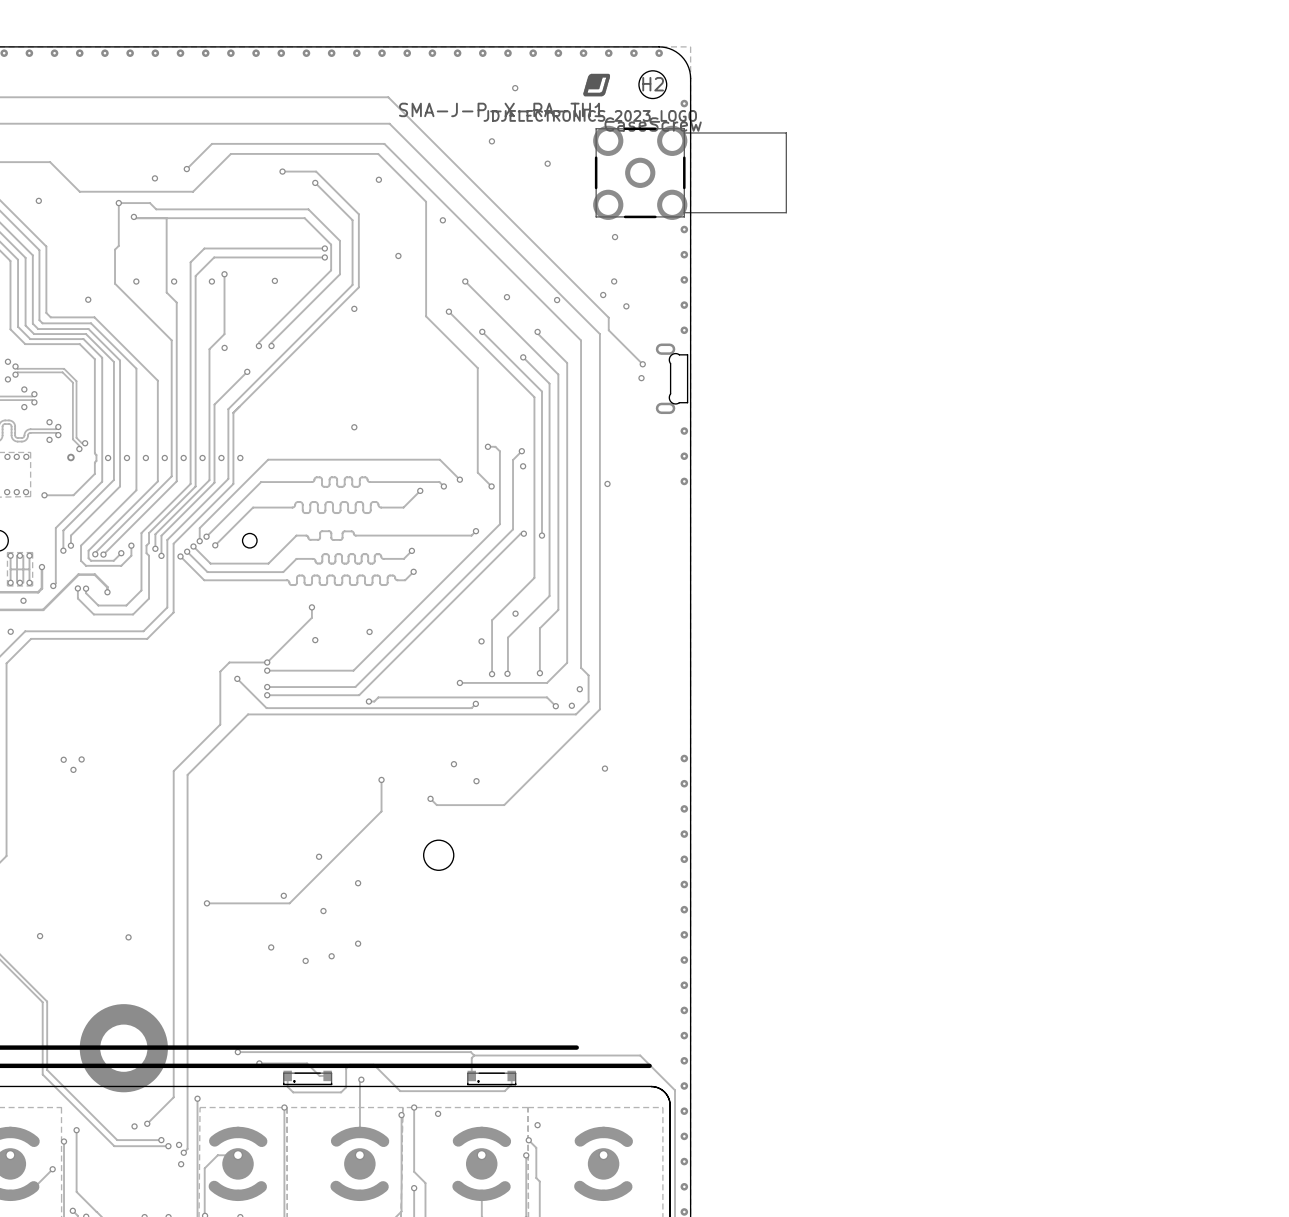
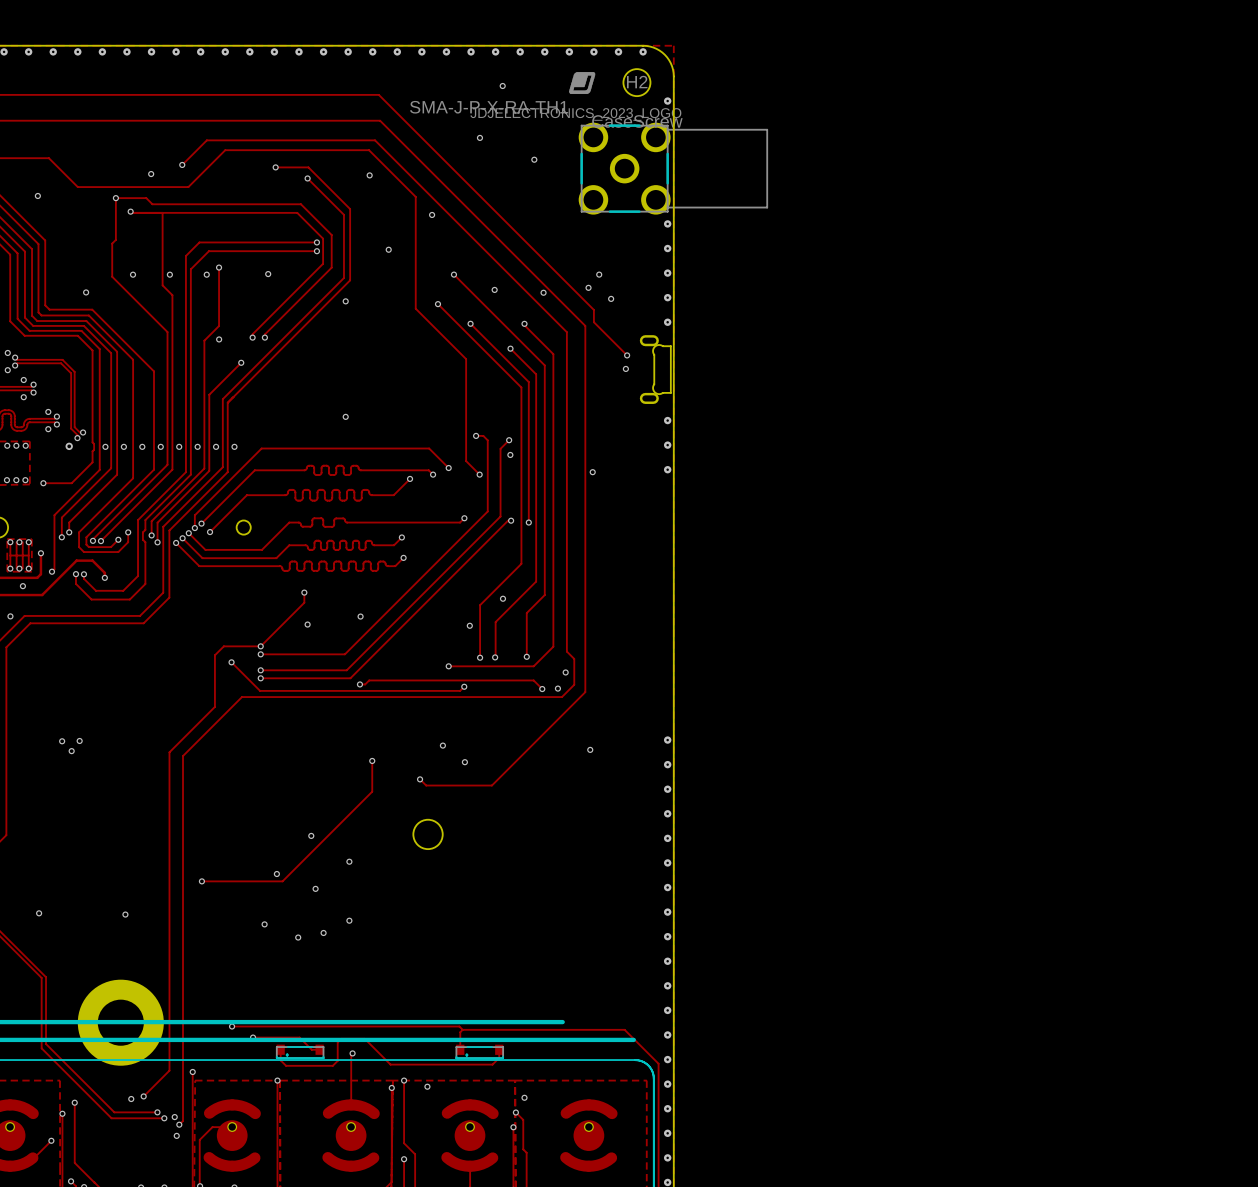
via: (615, 237) -> none

